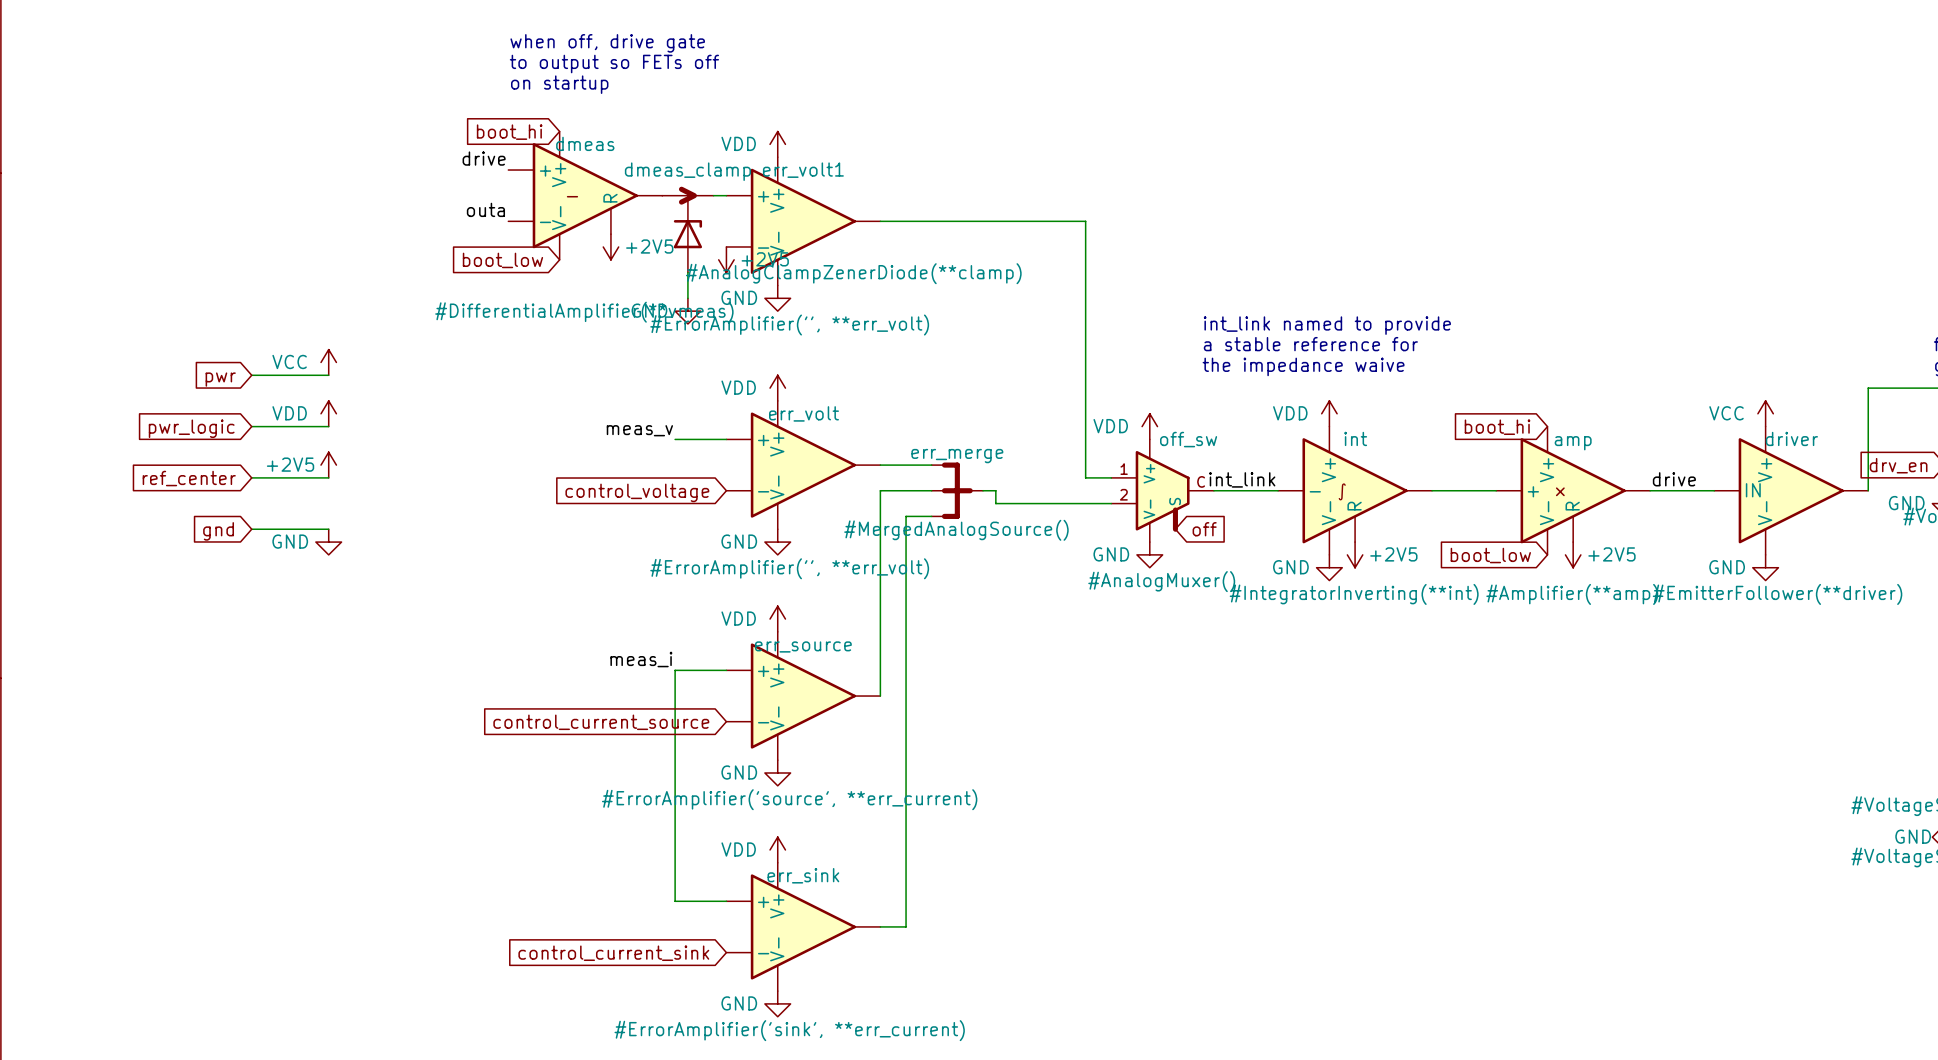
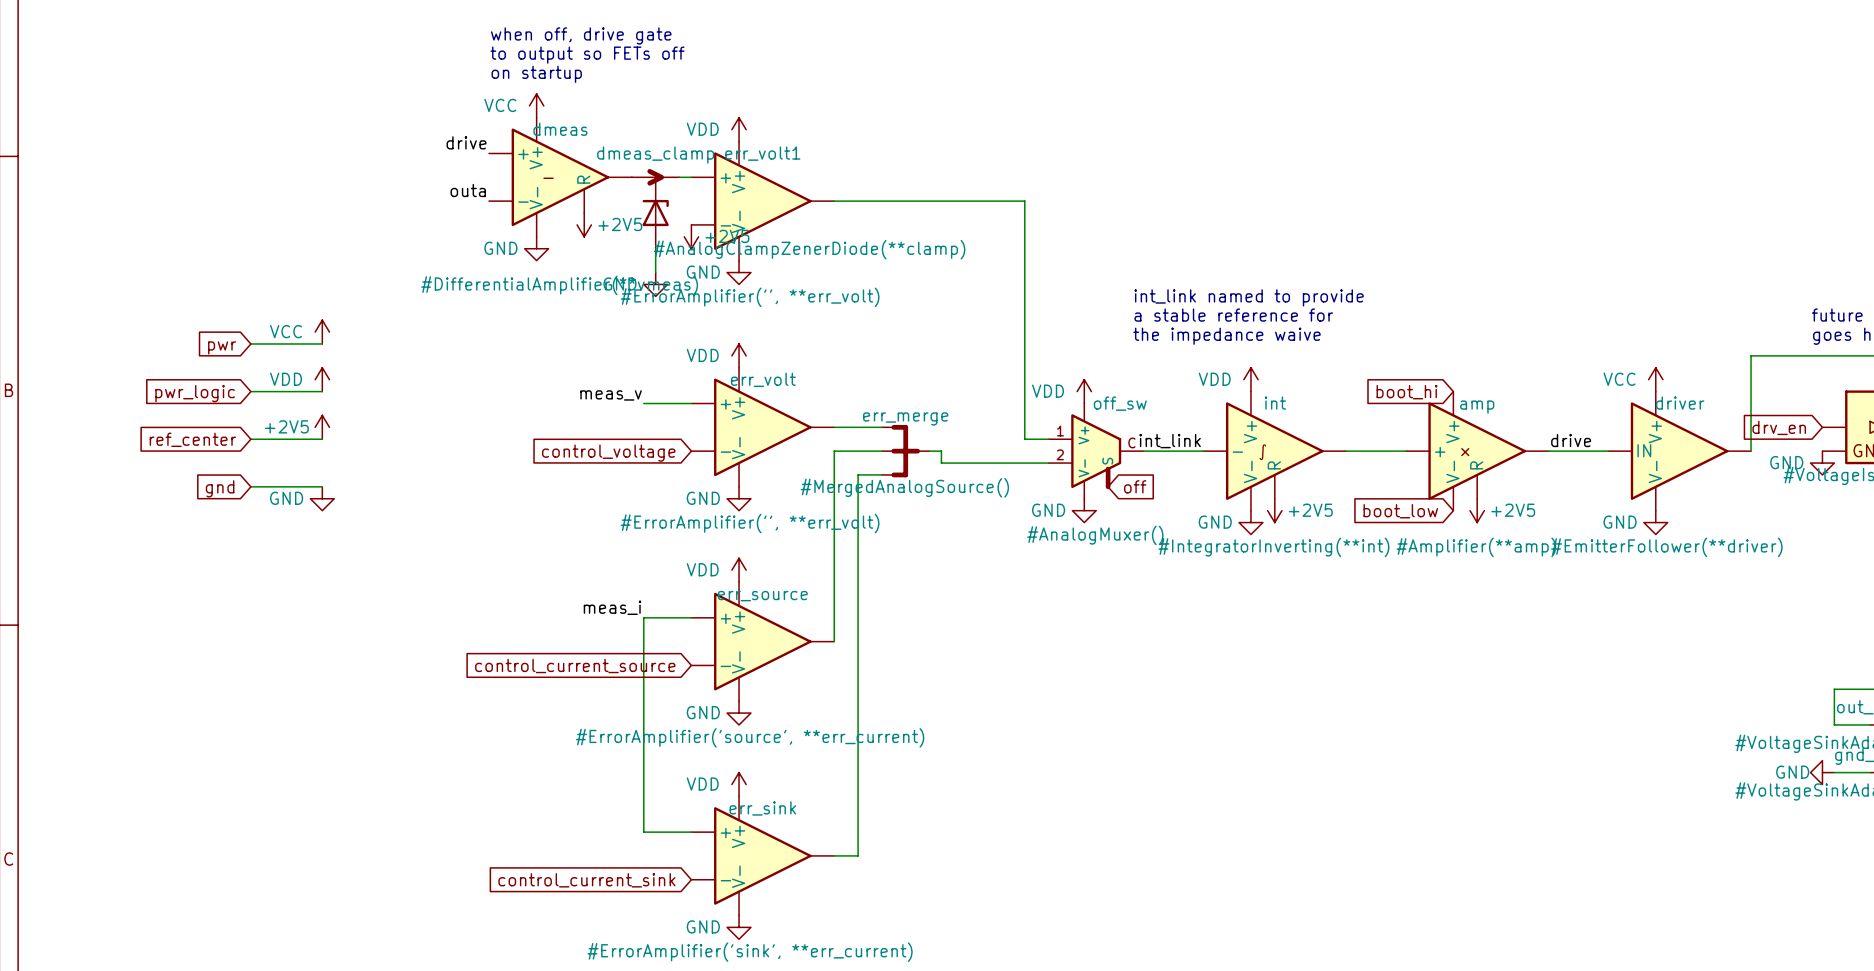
power symbol: none -> VCC (536, 105)
global label: boot_hi (509, 132) -> none
global label: boot_low (502, 260) -> none
power symbol: none -> GND (536, 248)

